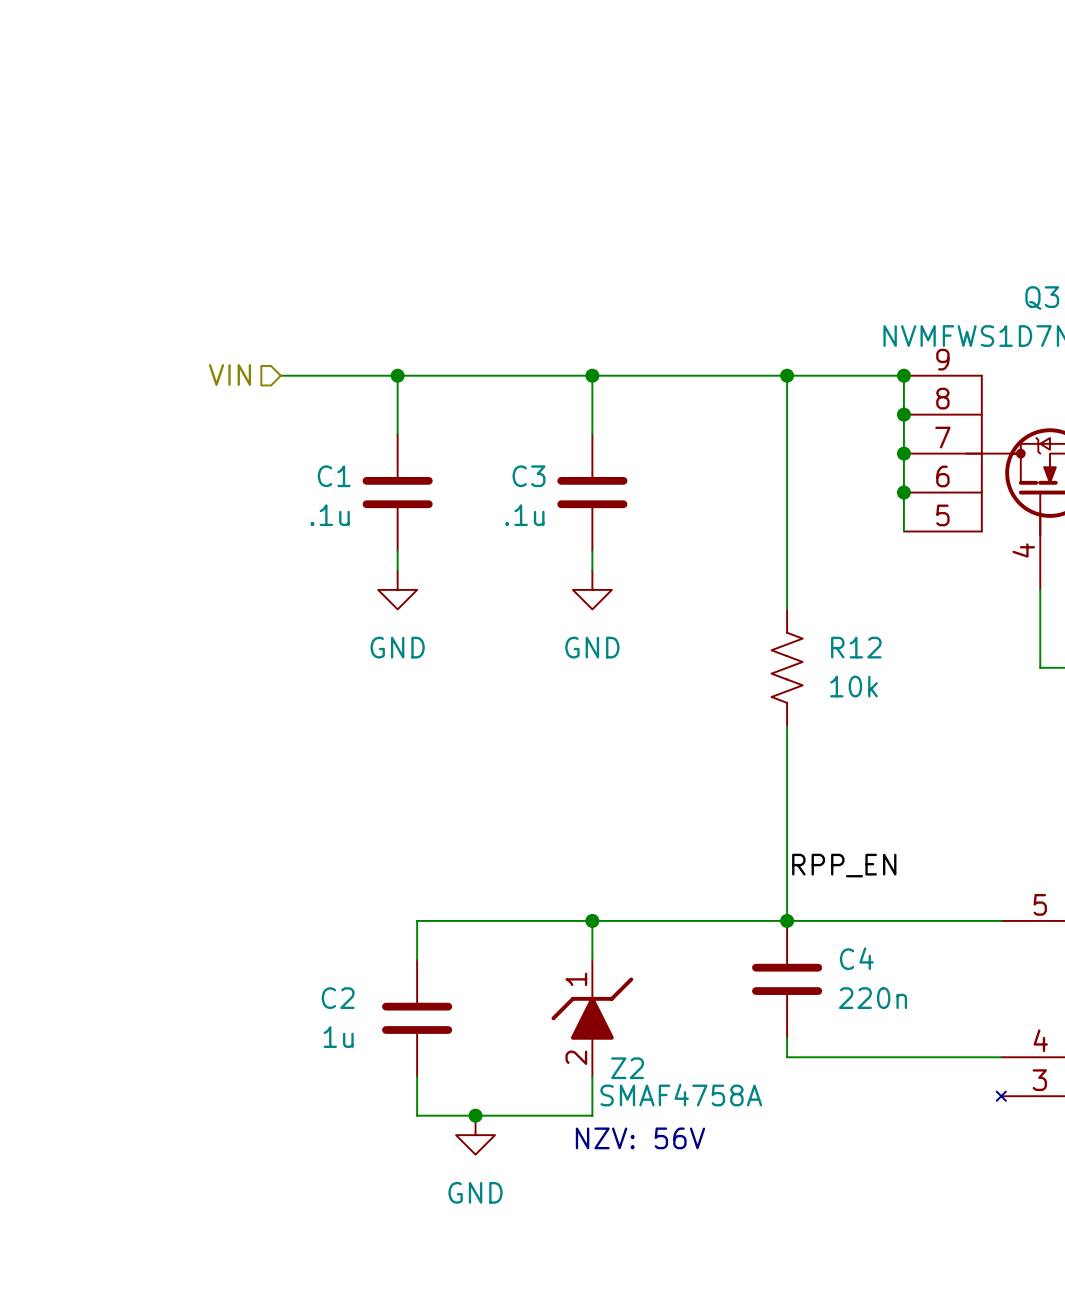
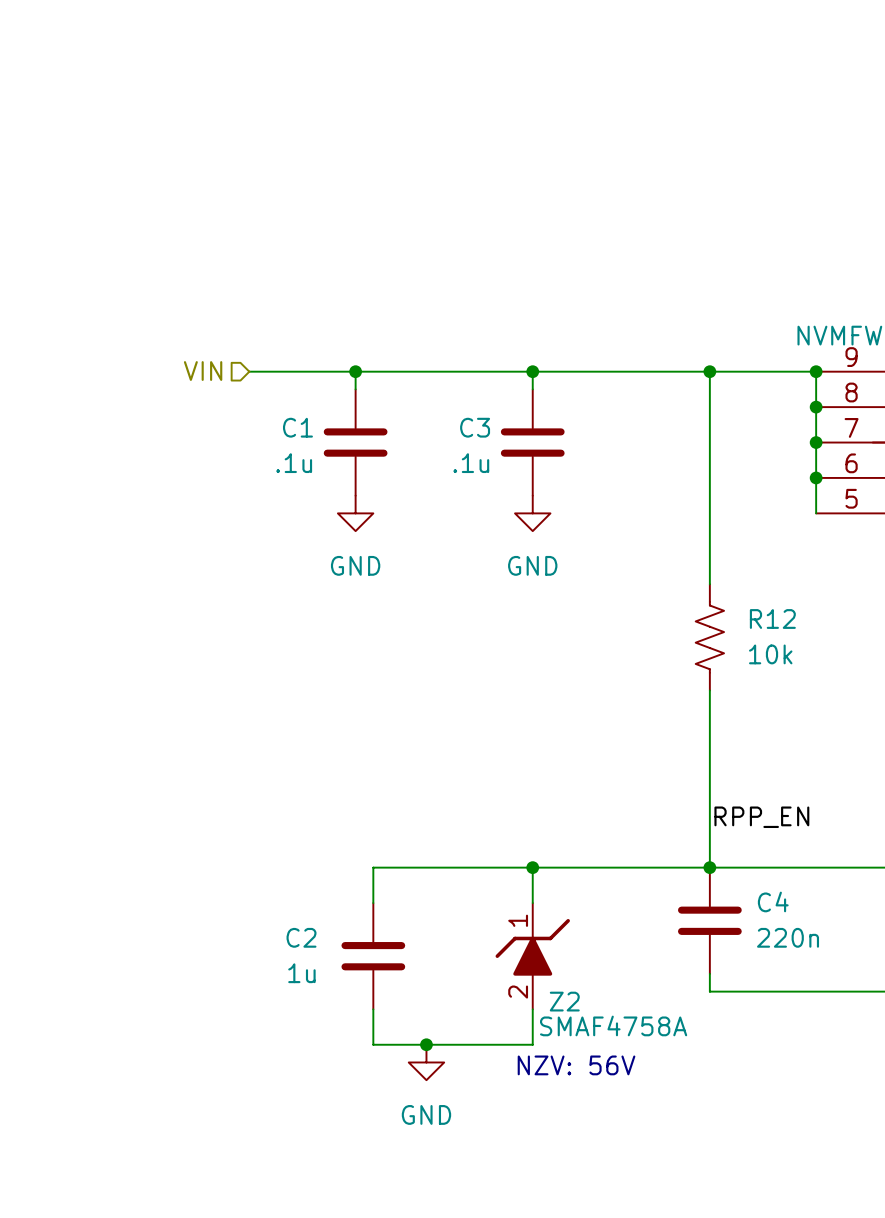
C1 position: (397, 492) -> (355, 442)
C3 position: (592, 492) -> (532, 442)
wire: (397, 550) (397, 570) -> none
wire: (592, 550) (592, 570) -> none
power symbol position: GND (397, 589) -> GND (355, 513)
power symbol position: GND (592, 589) -> GND (532, 513)

